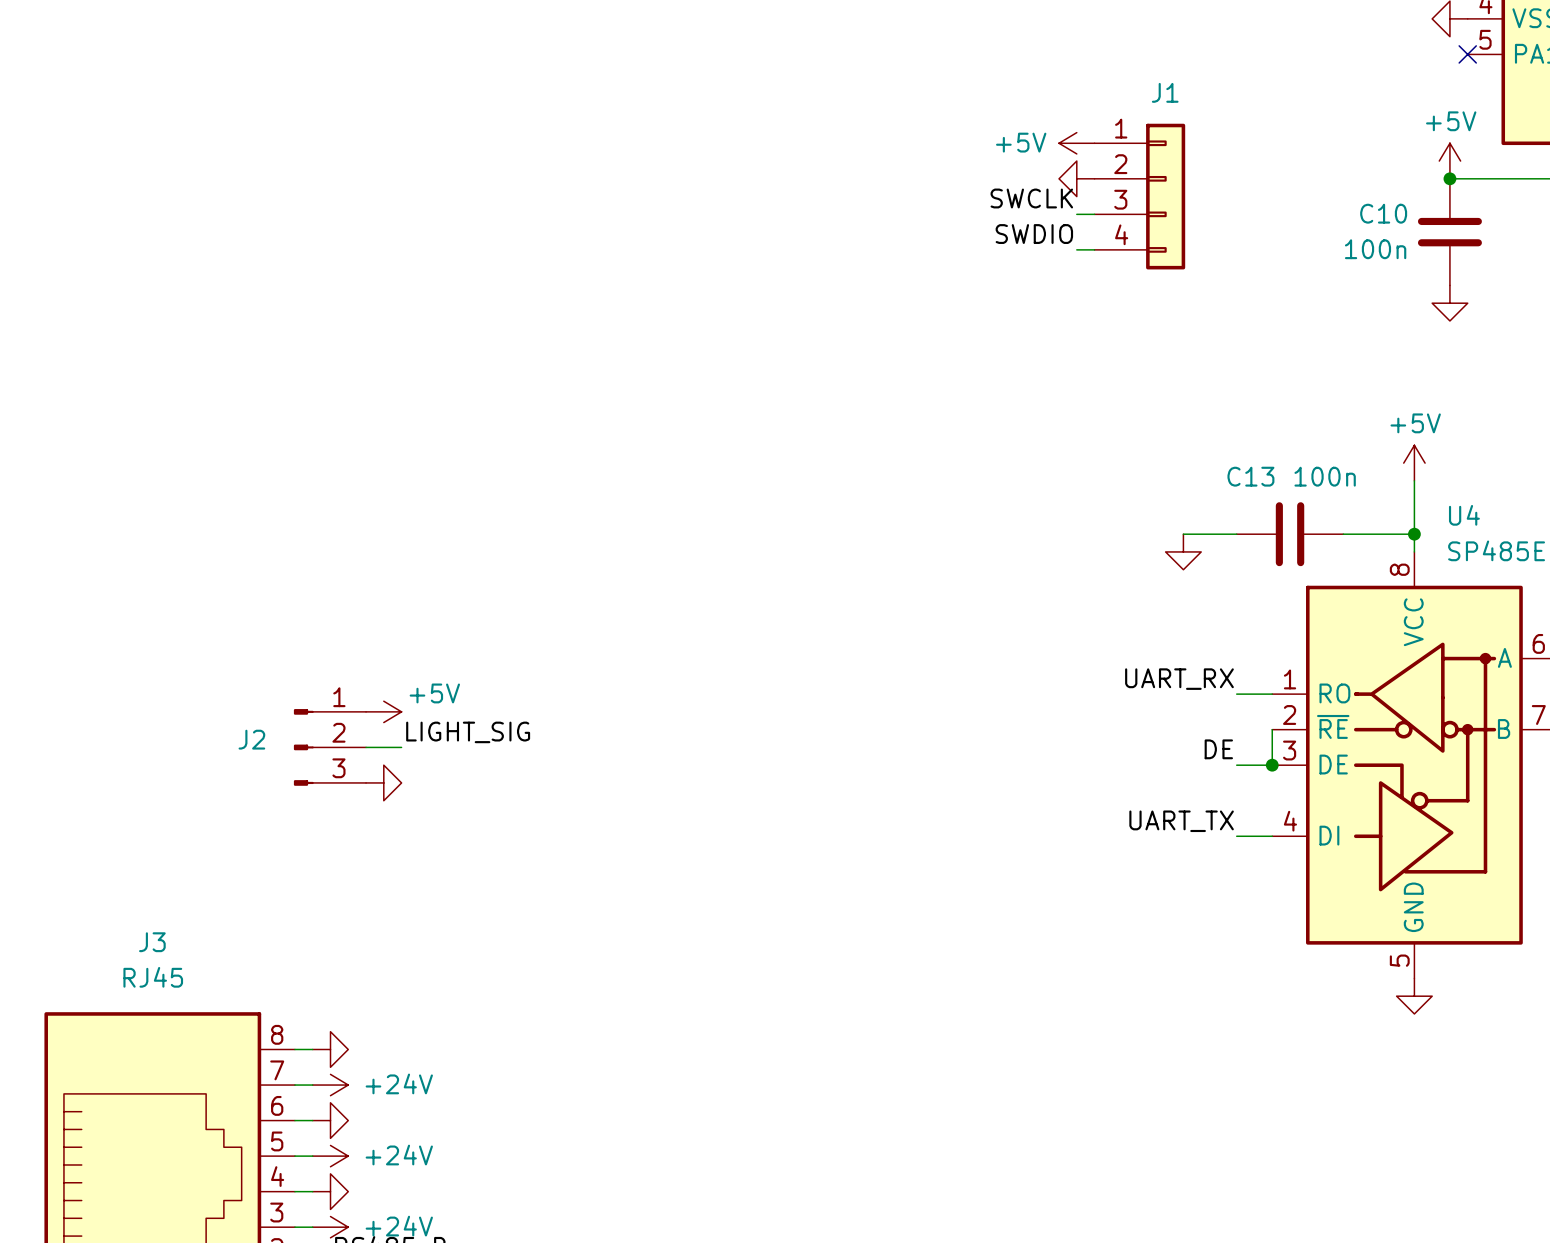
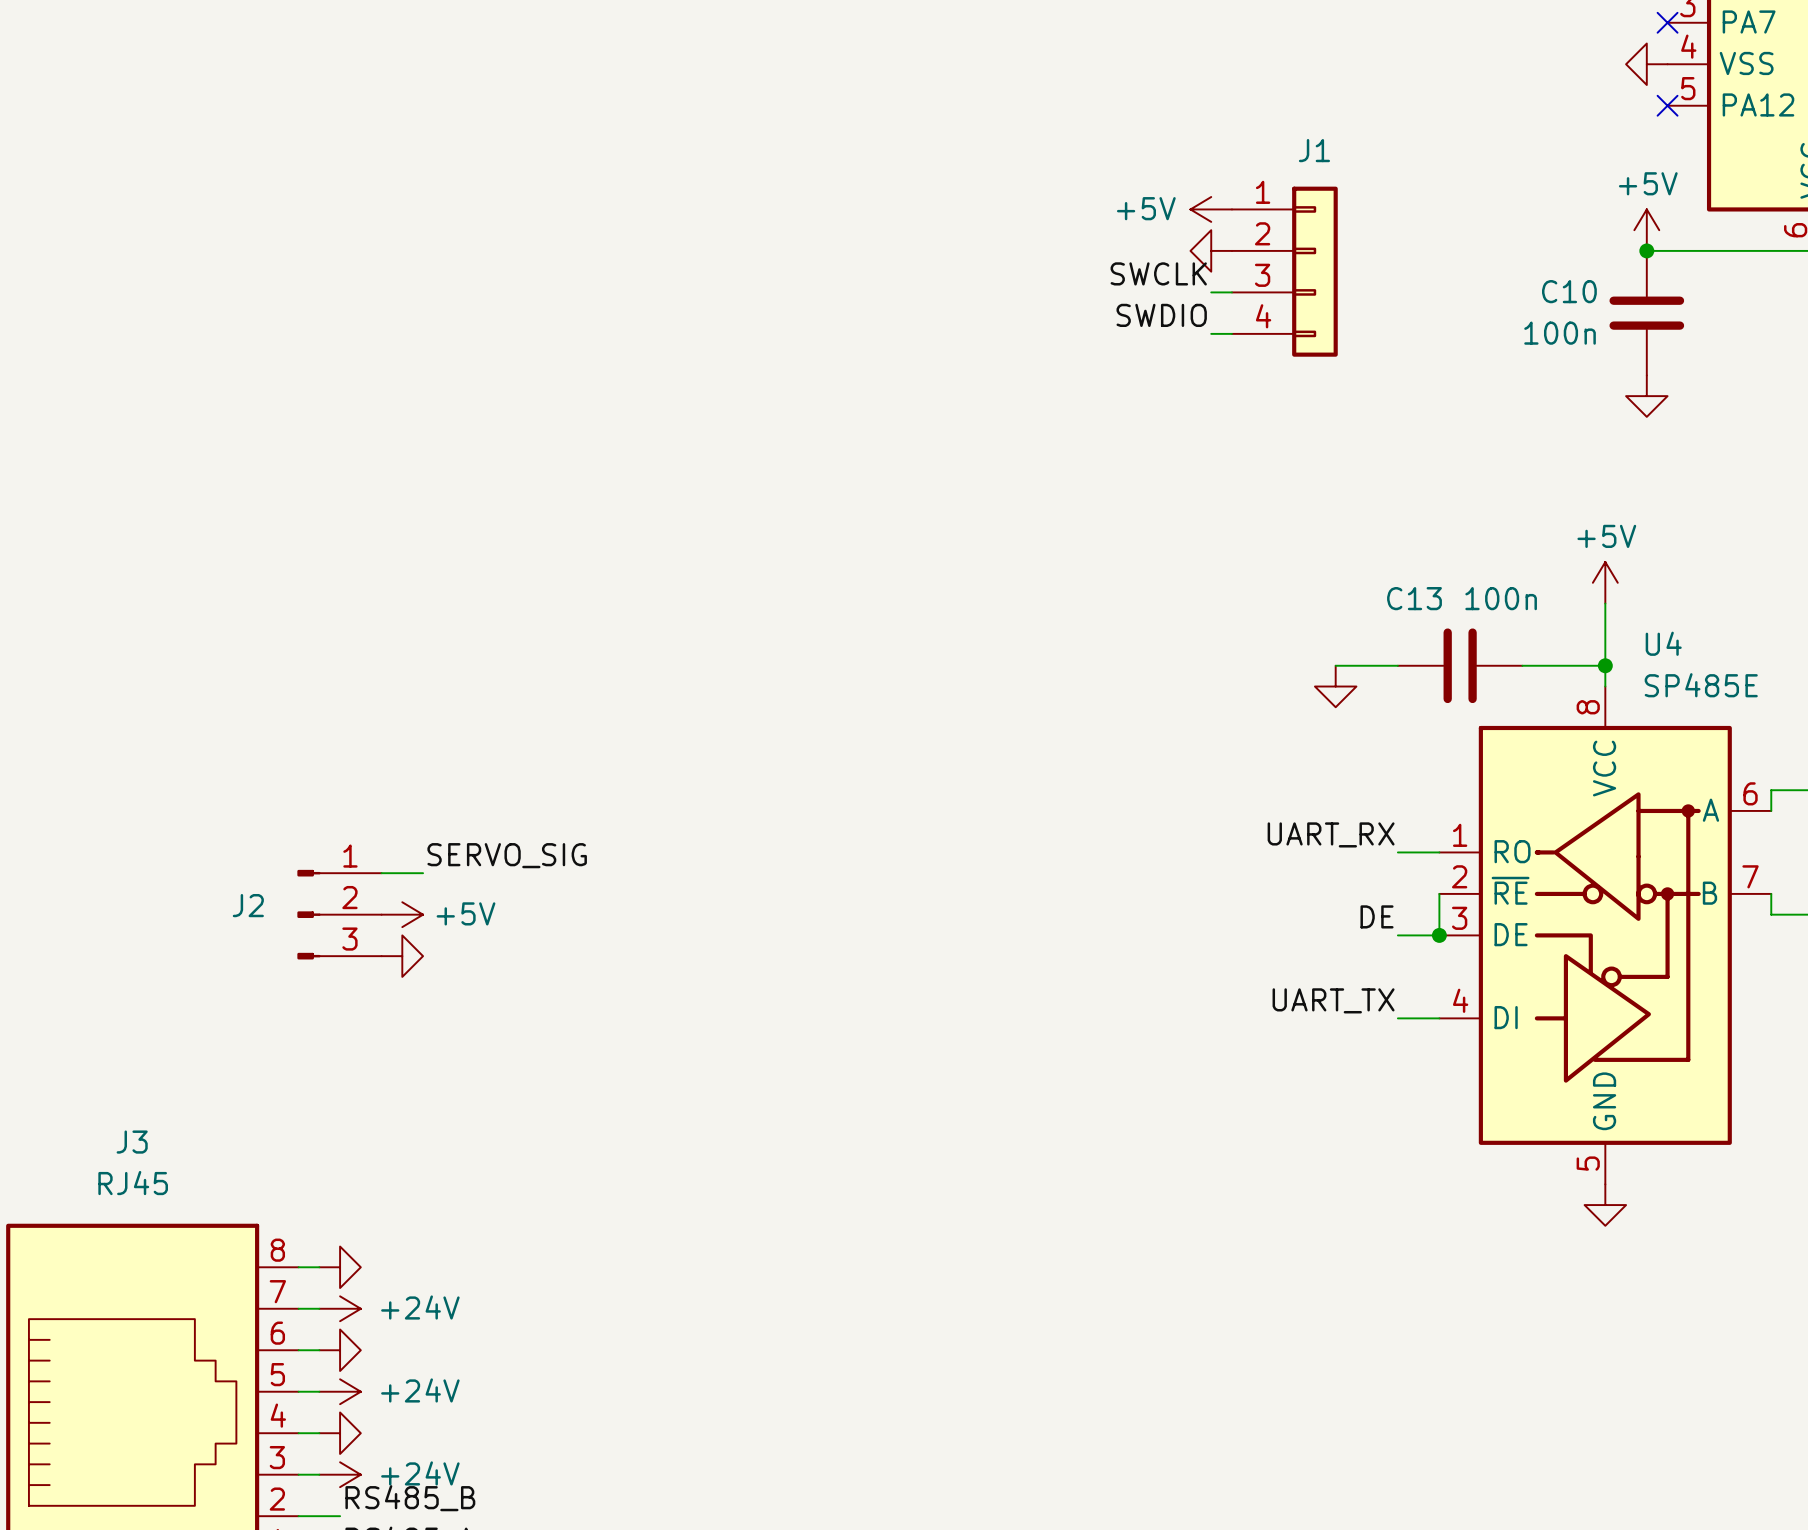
power symbol text position: +5V (434, 693) -> +5V (466, 913)
label: none -> SERVO_SIG (507, 855)
power symbol position: +5V (383, 711) -> +5V (402, 914)
label: LIGHT_SIG (468, 732) -> none

